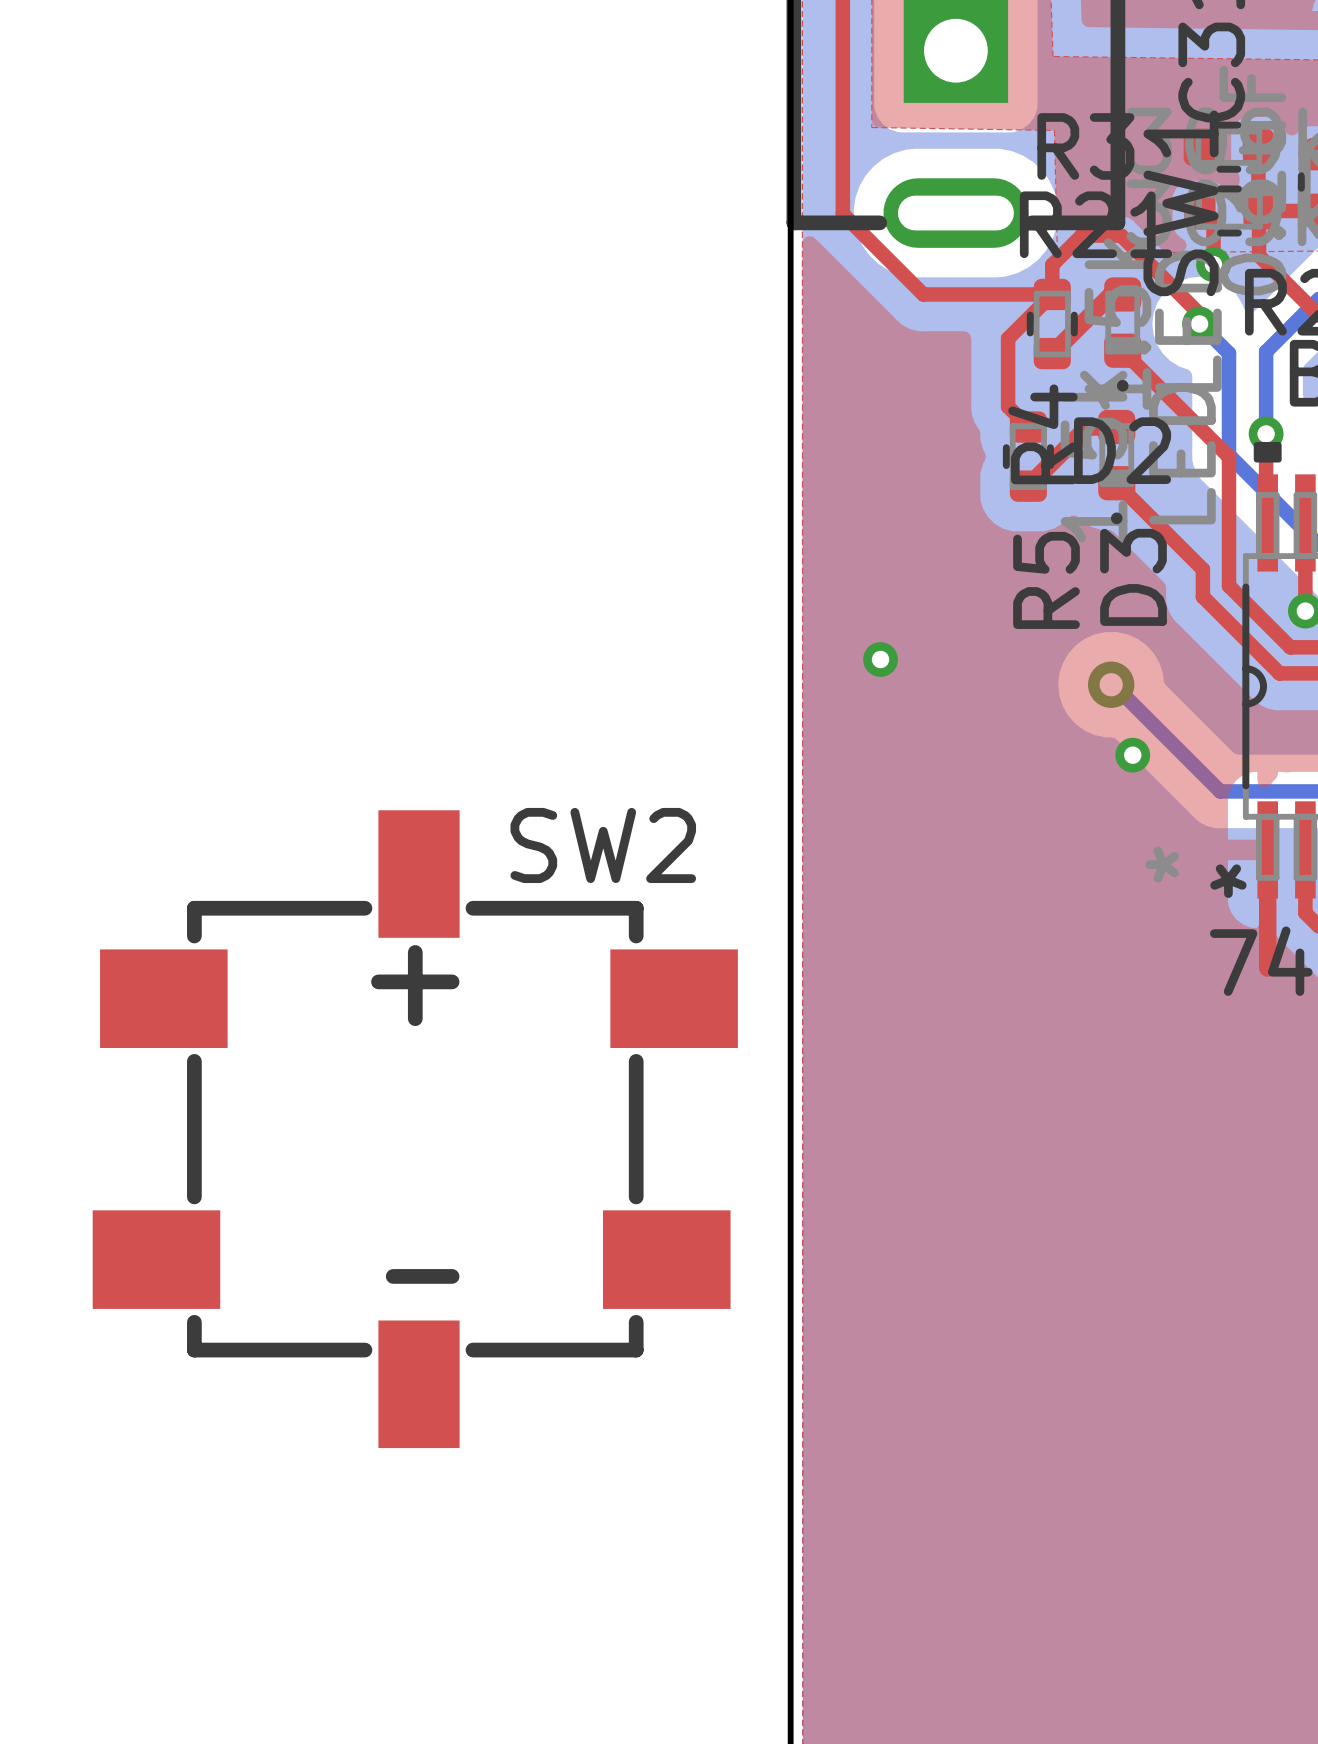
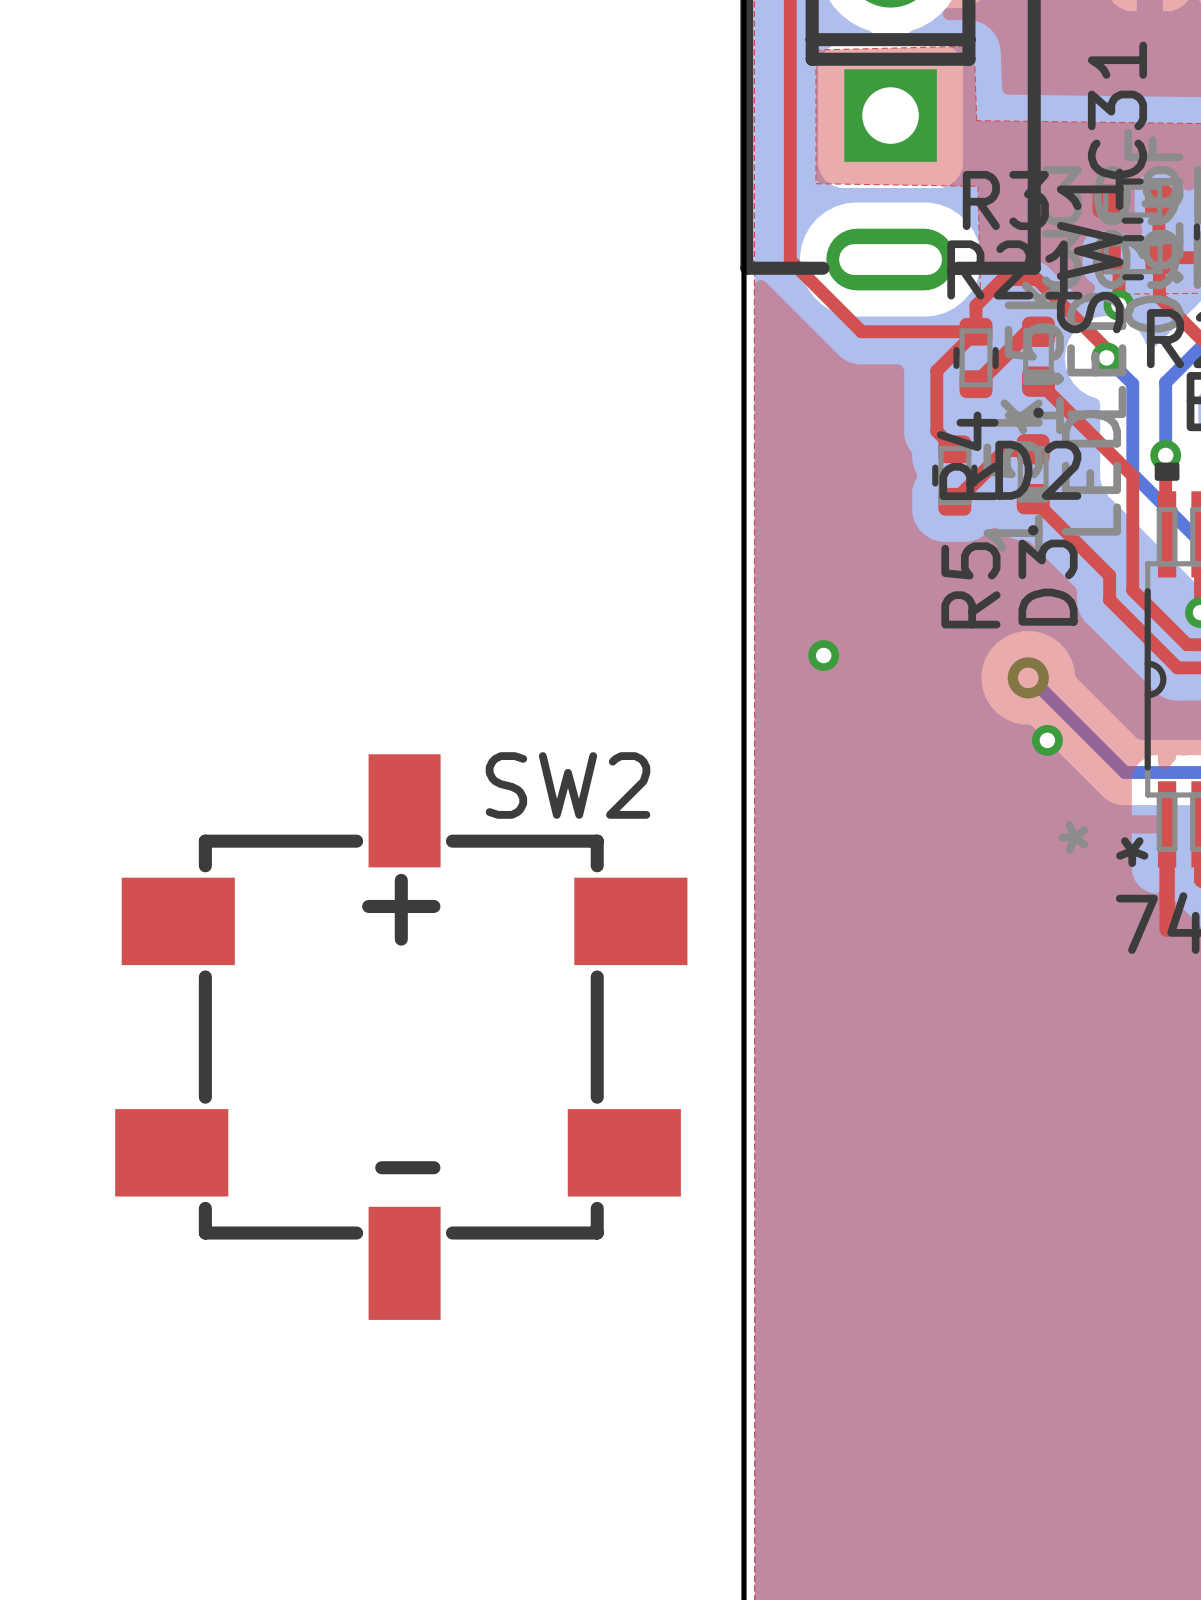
SW2 position: (415, 1129) -> (401, 1037)

